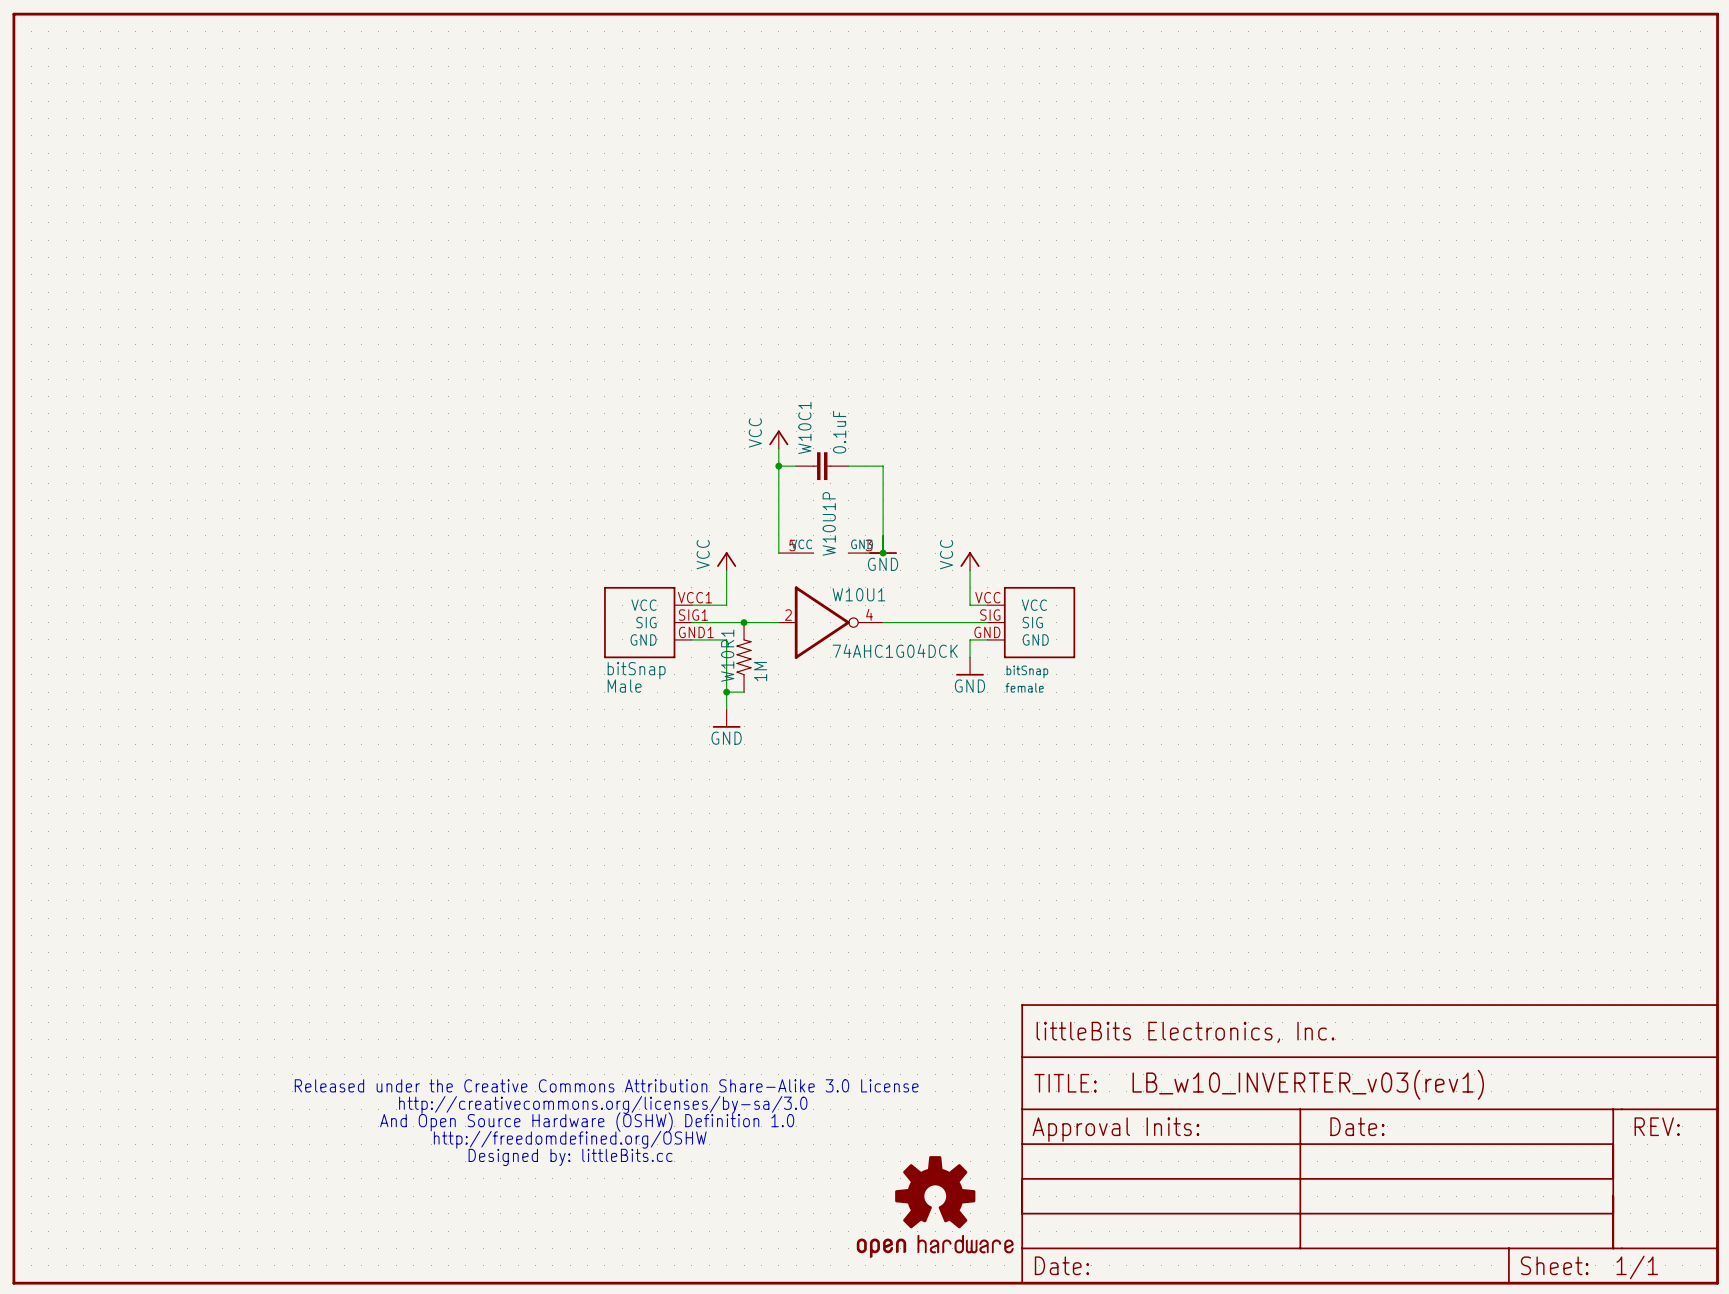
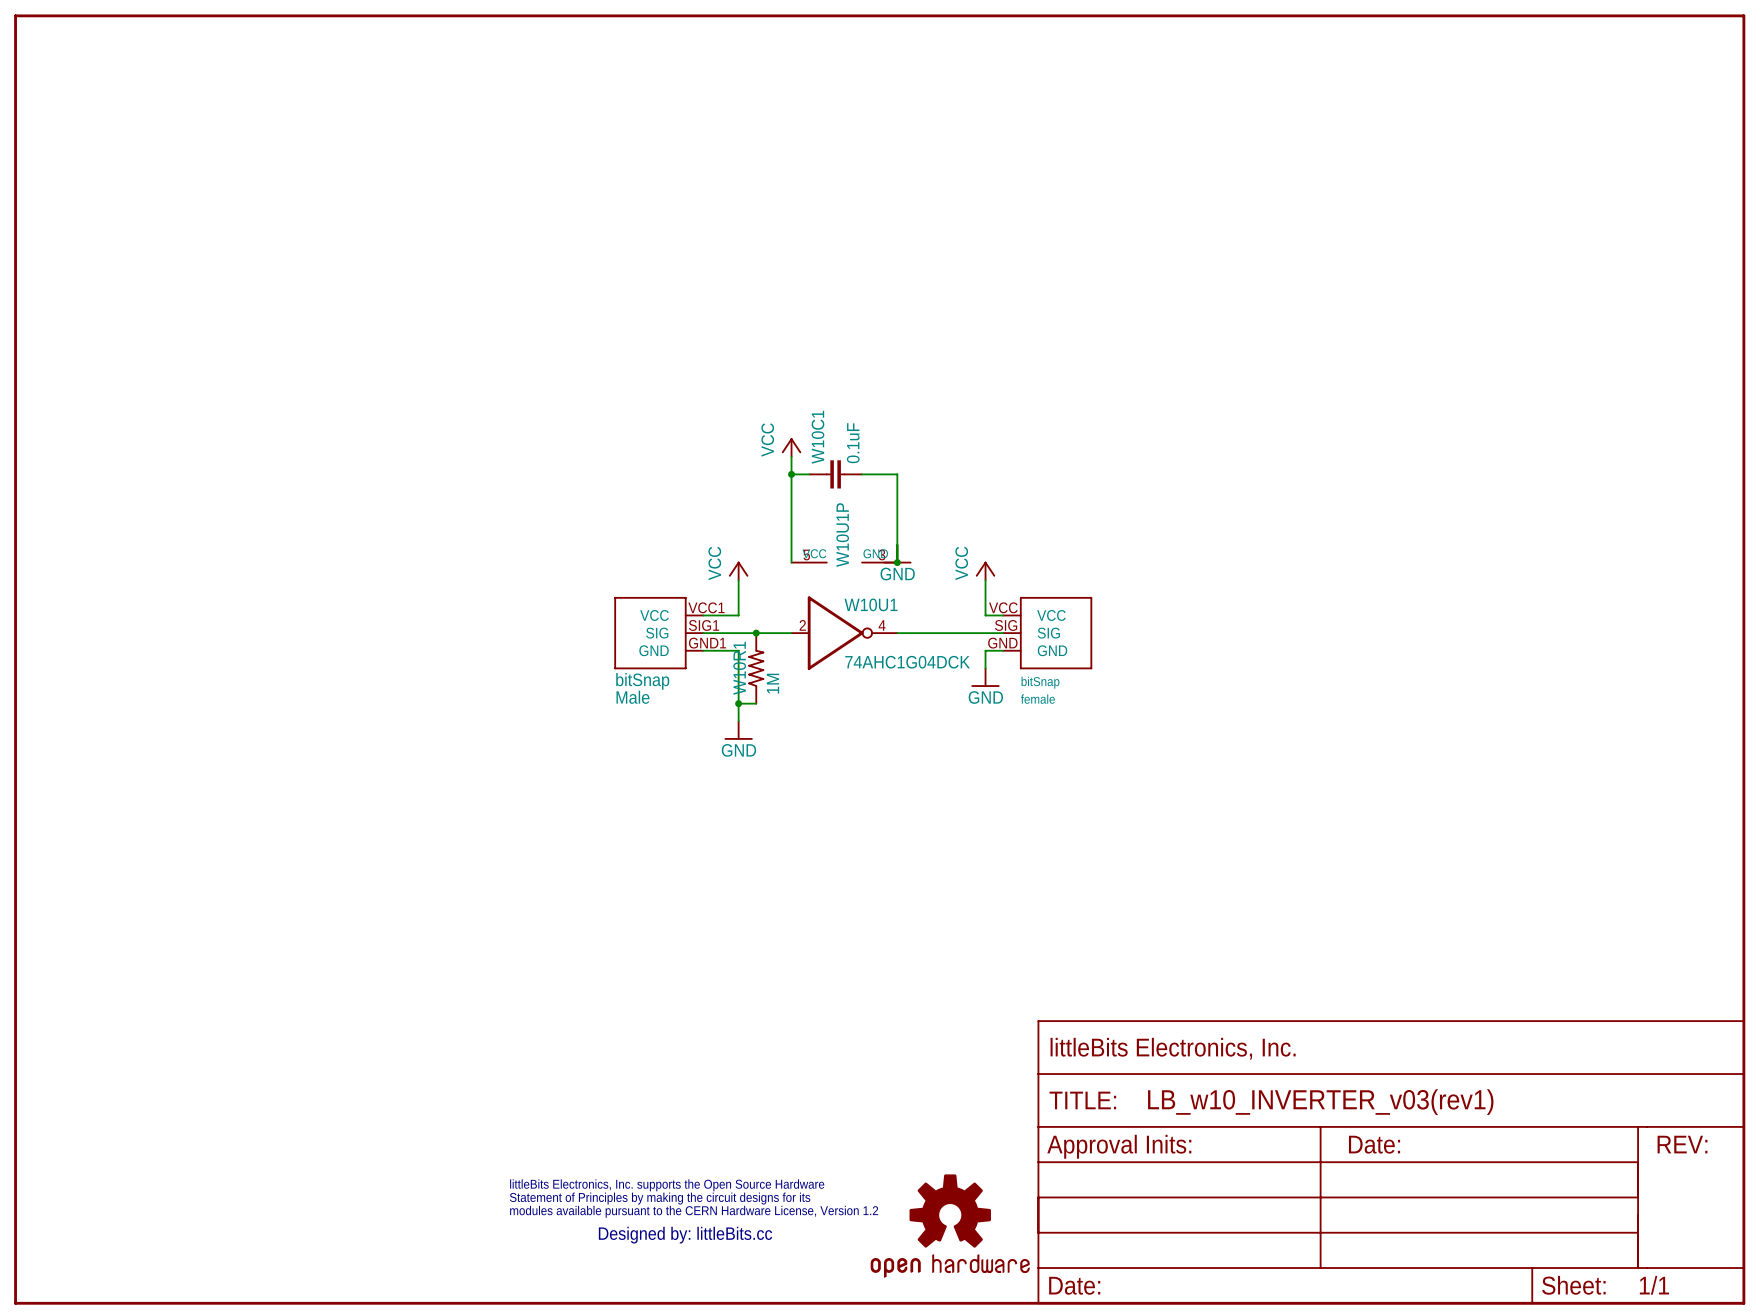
part: (606, 1122) -> none
part: none -> (694, 1211)

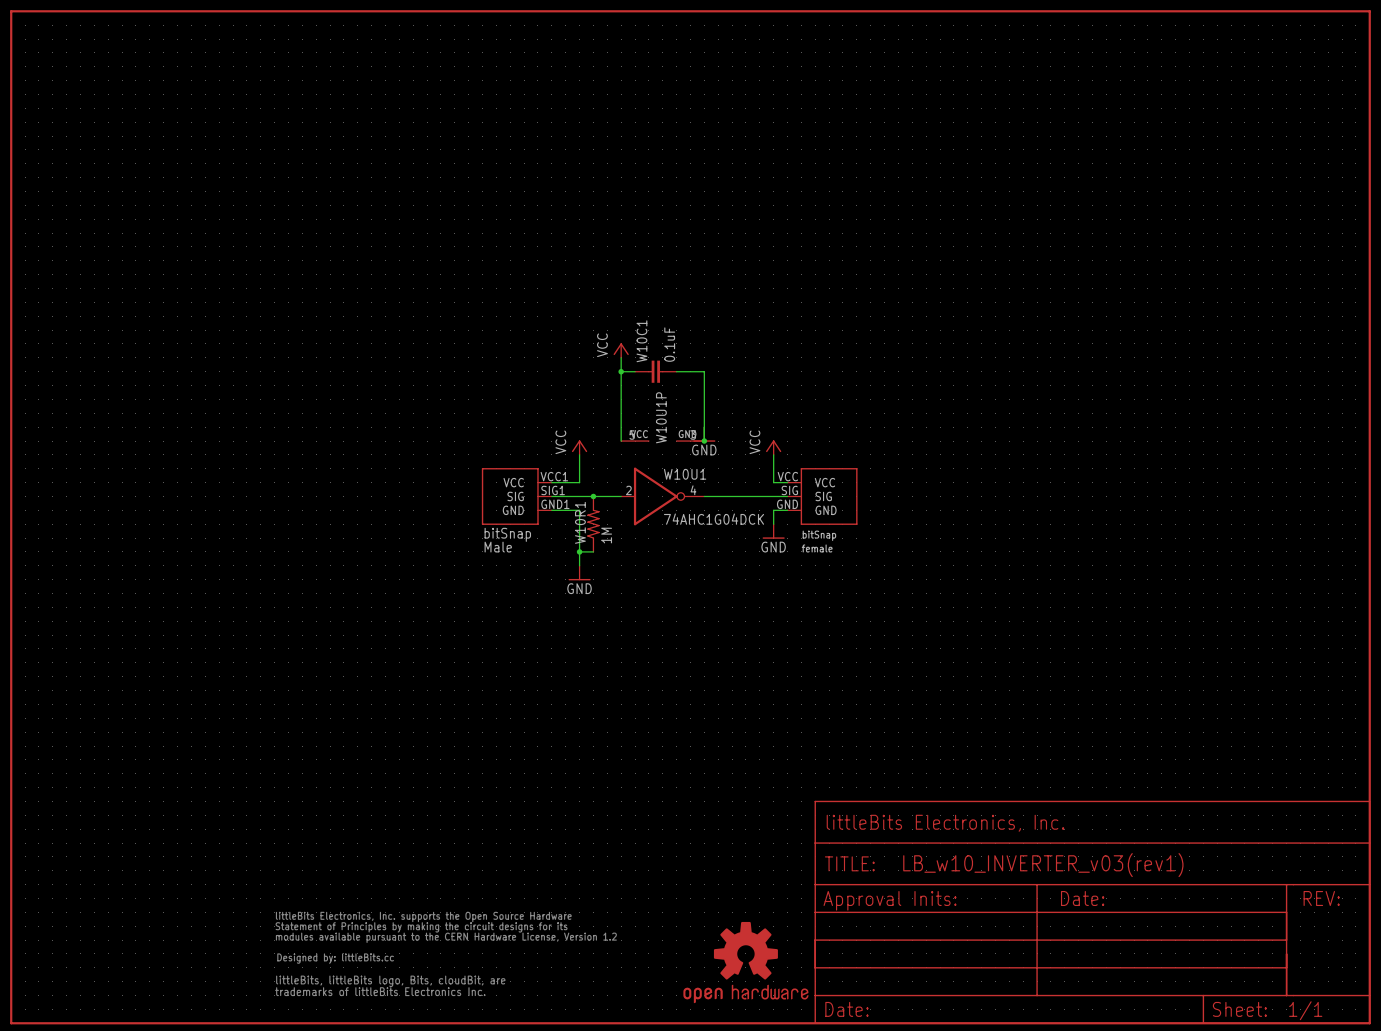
part: (694, 1211) -> none
part: none -> (445, 953)

